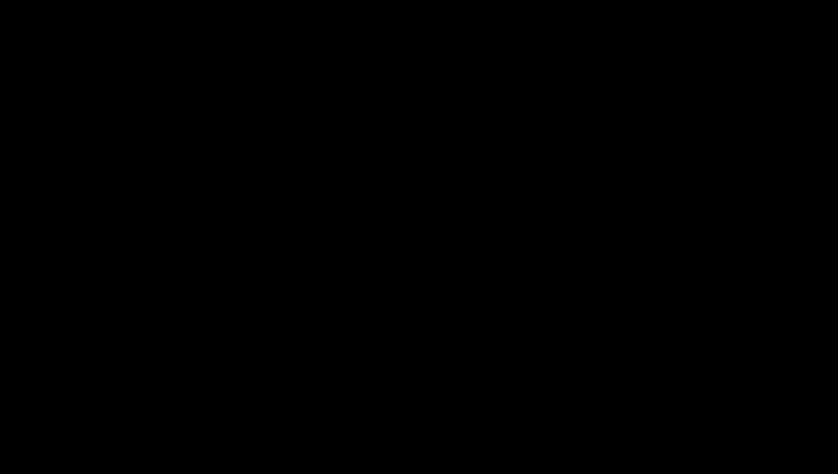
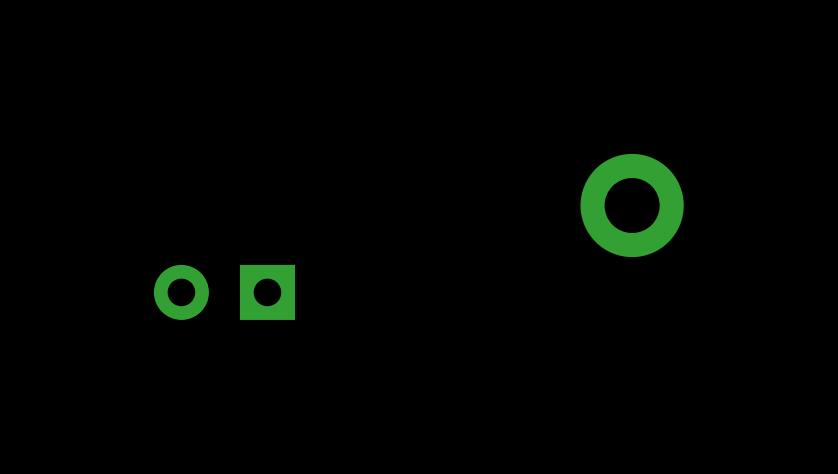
part: none -> (632, 205)
part: none -> (224, 292)

